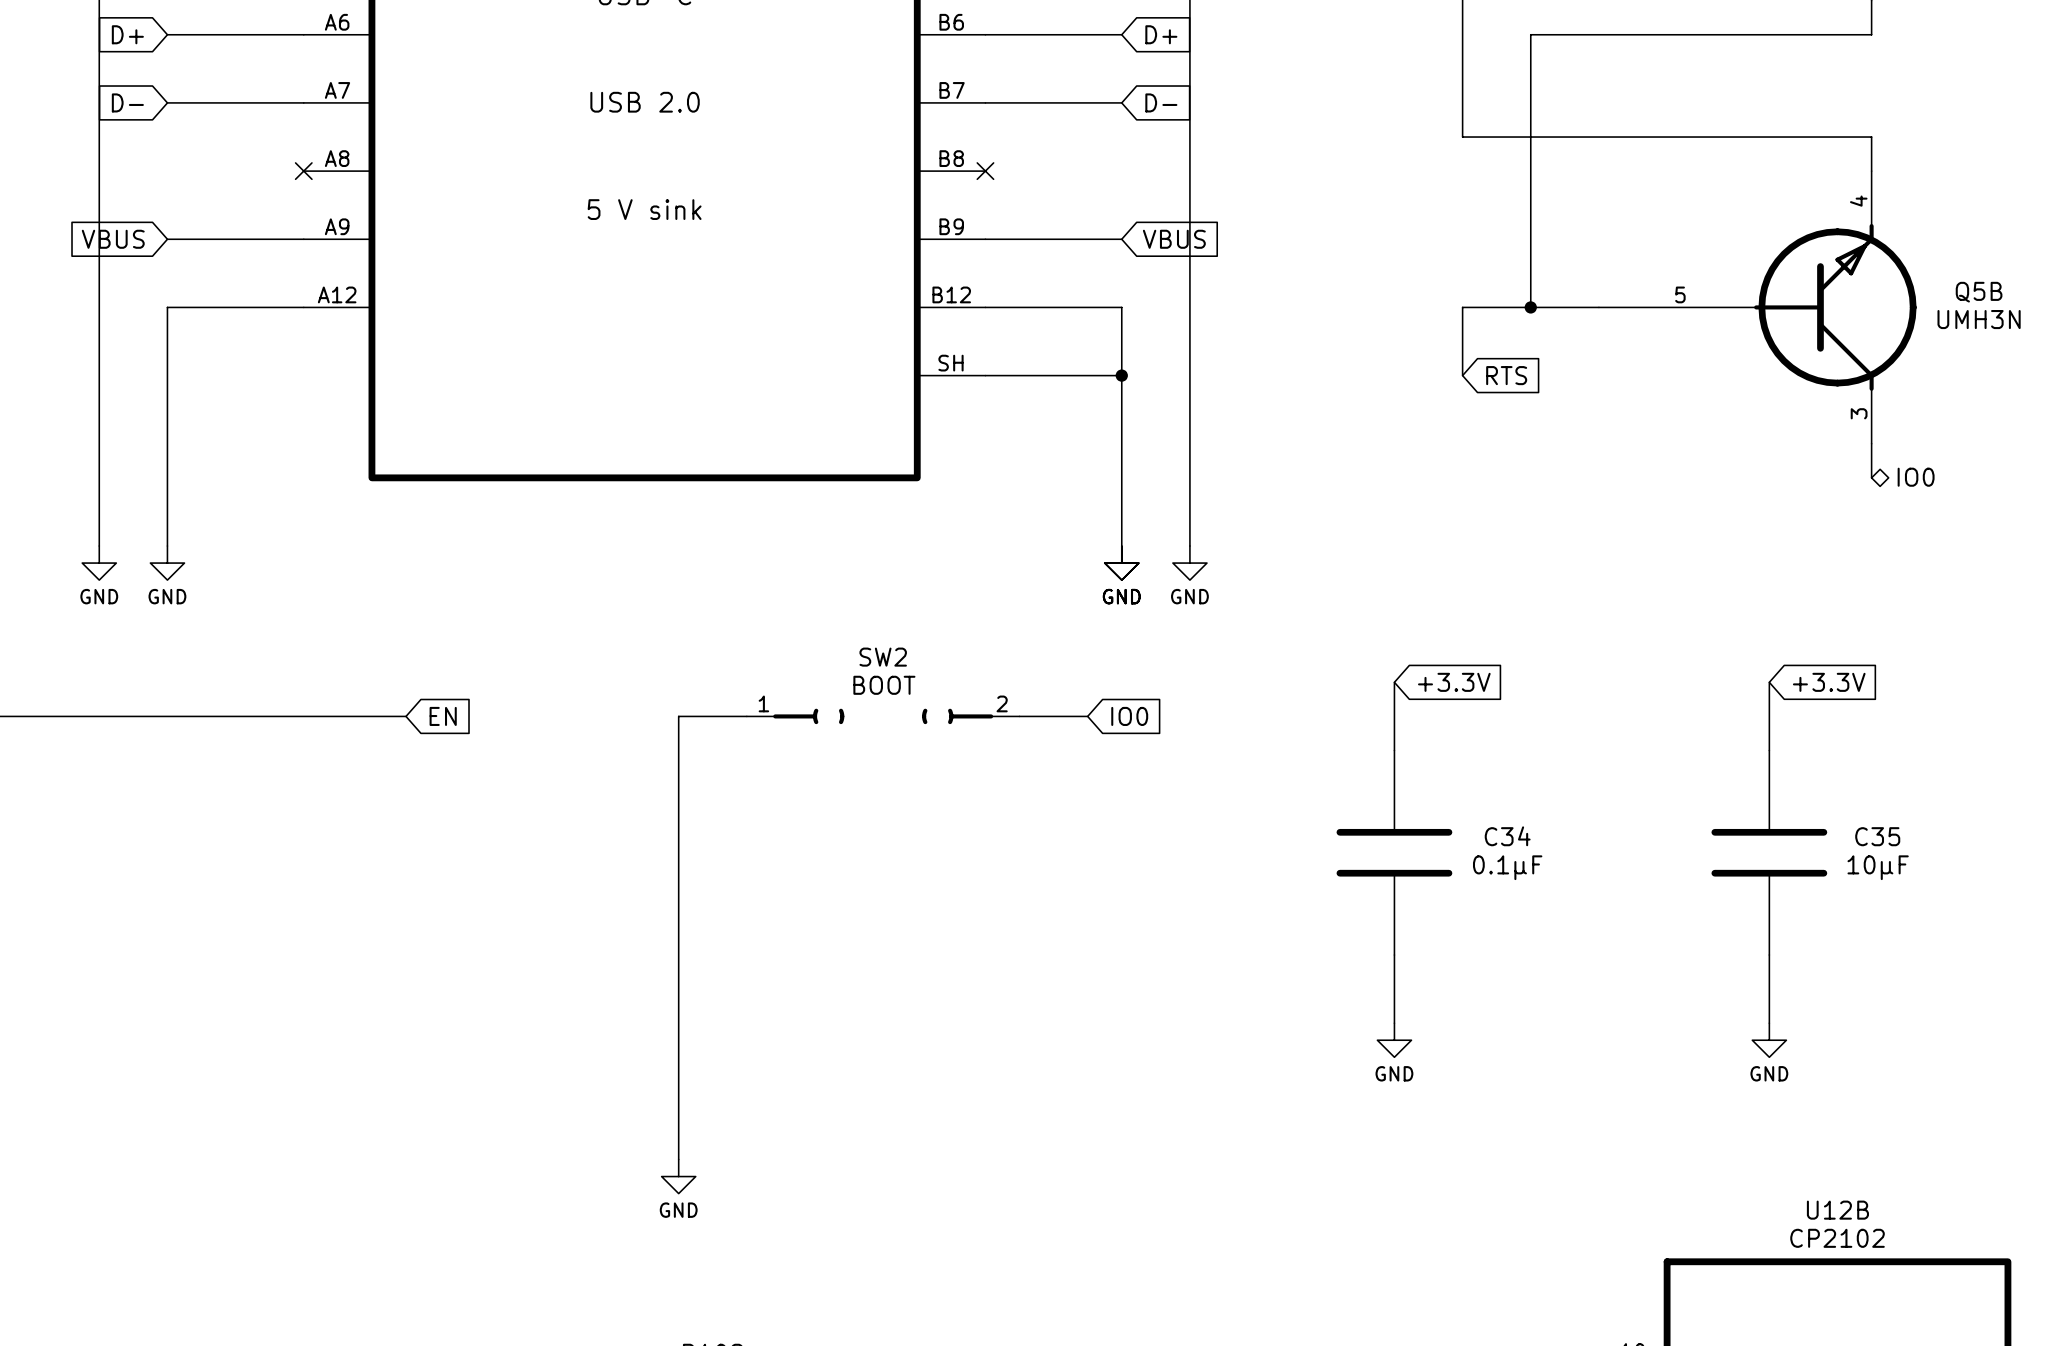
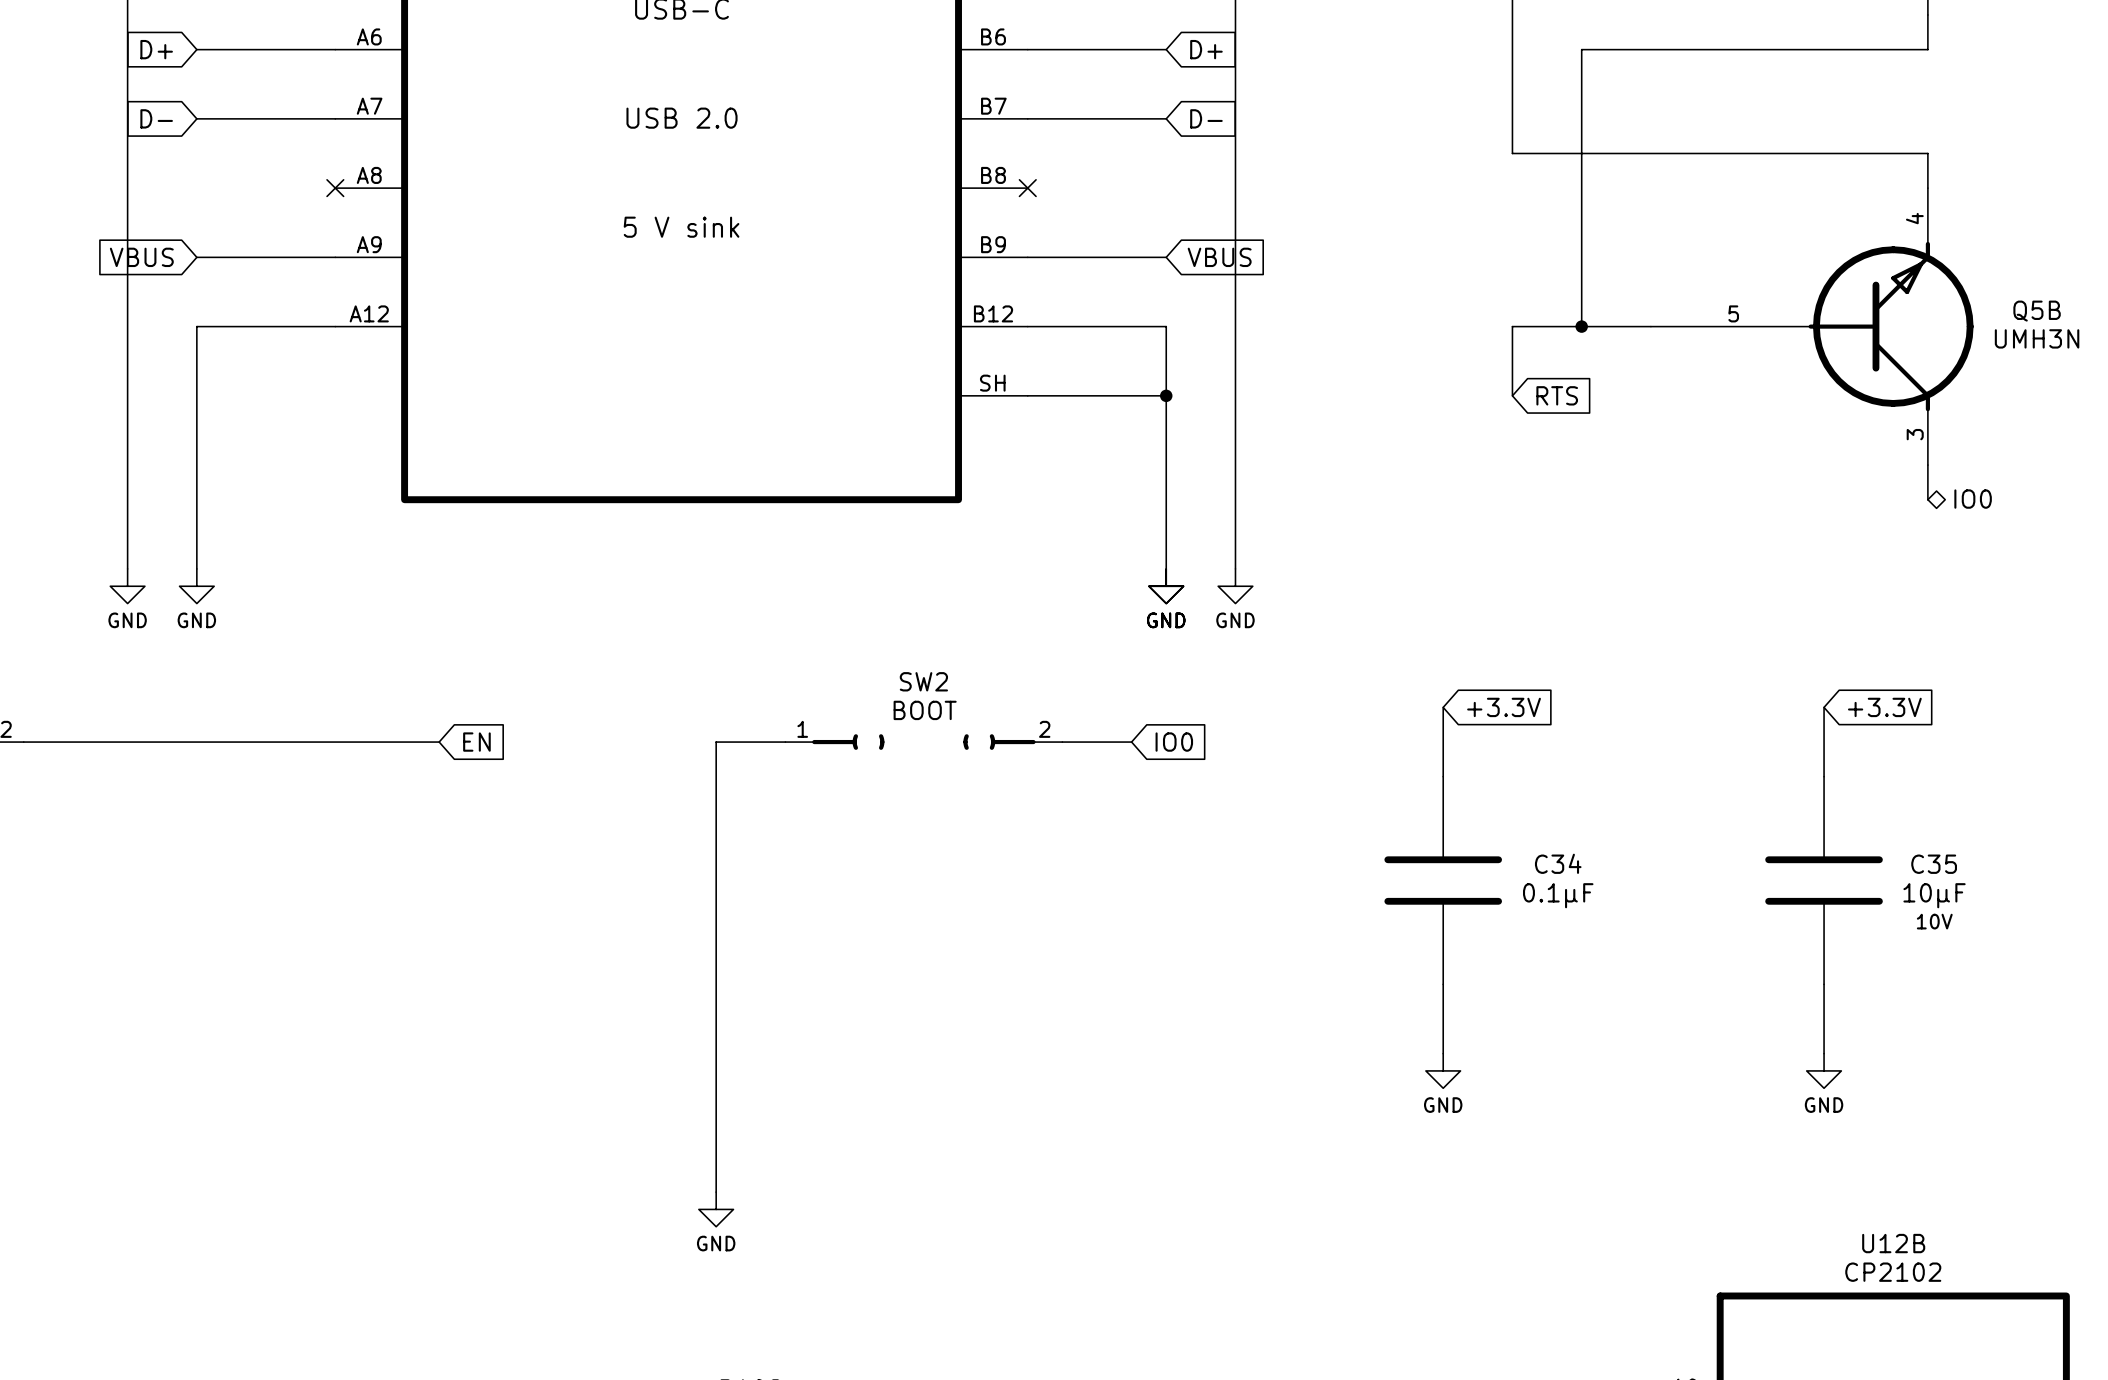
C35 text: none -> 10V (1934, 921)

